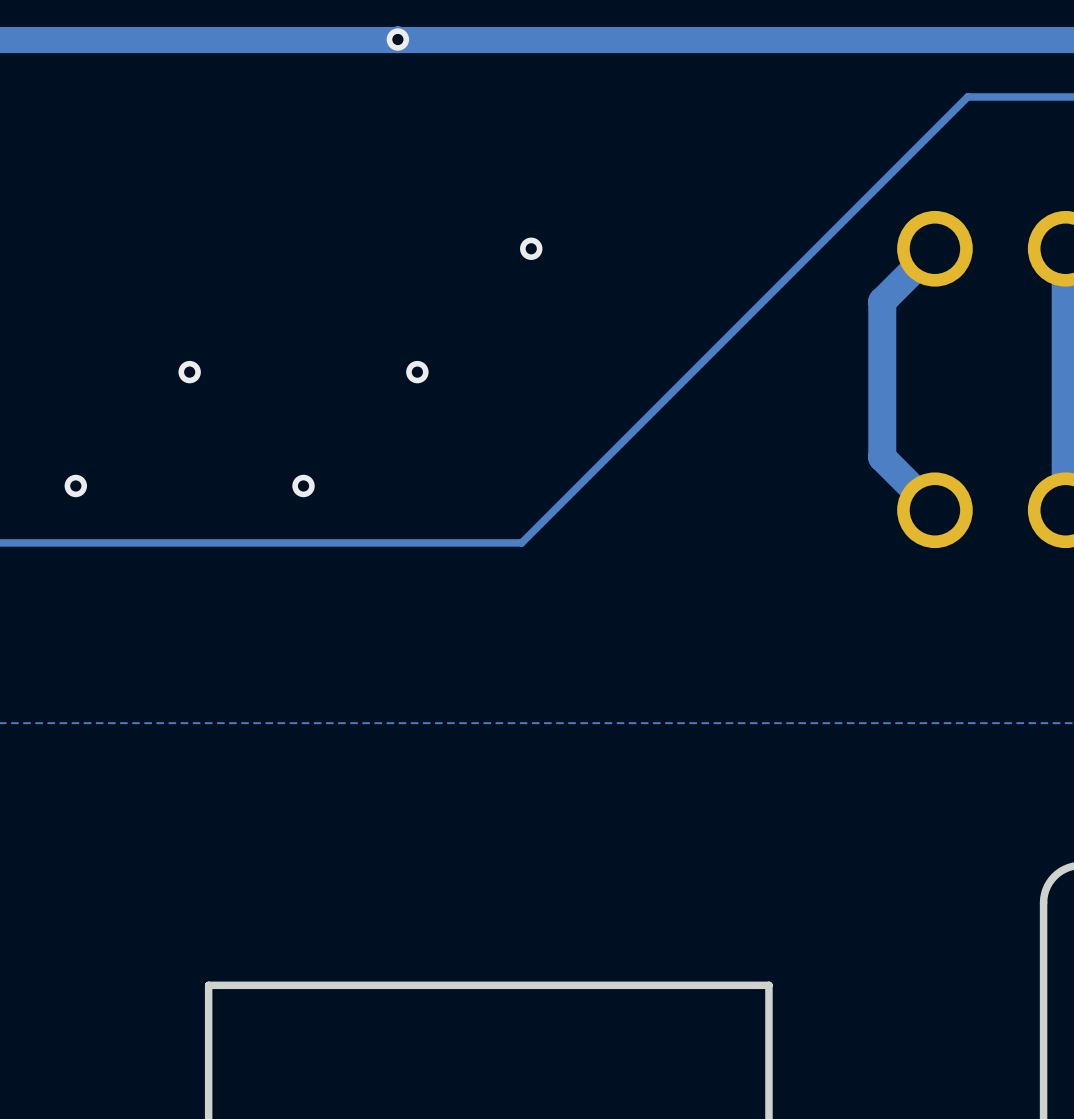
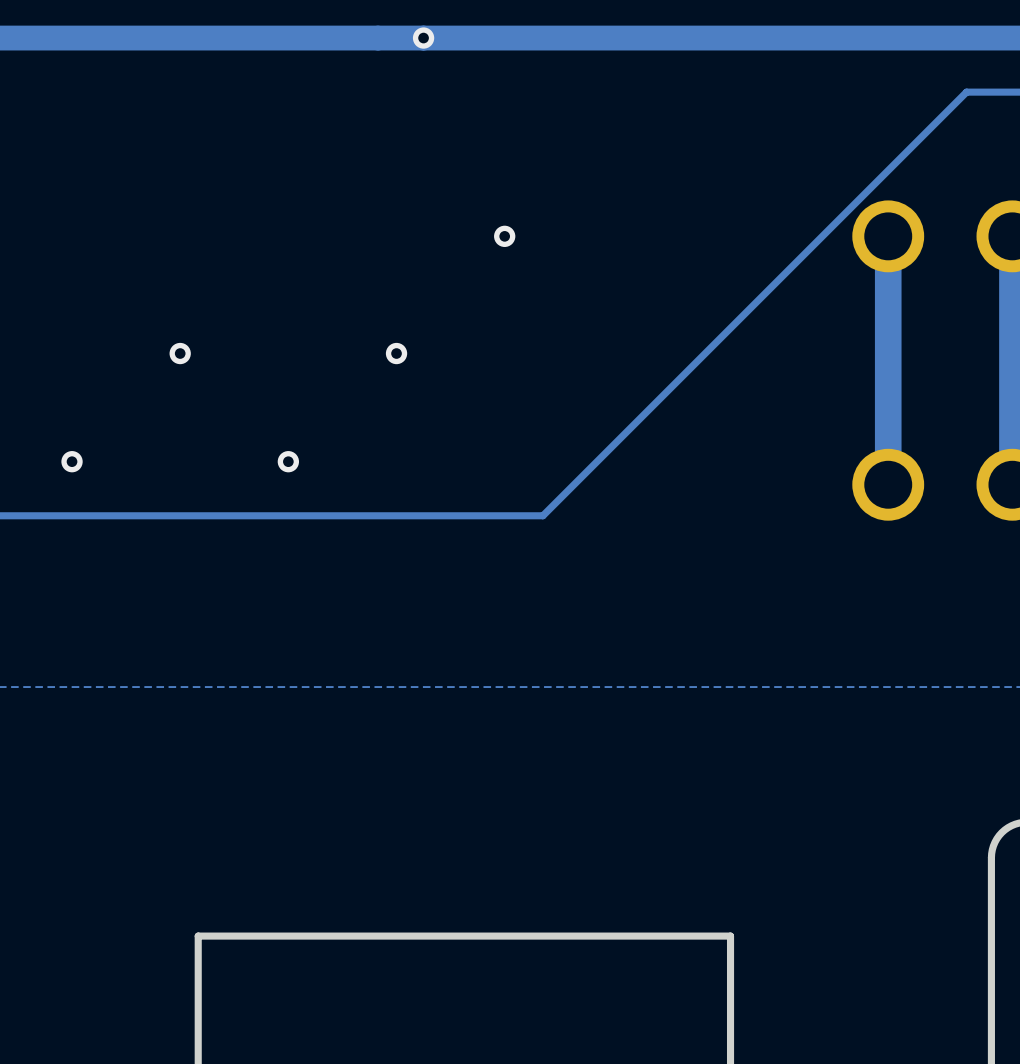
via position: (397, 39) -> (423, 38)
track: (1017, 96) (967, 96) (521, 542) -> (966, 92) (542, 515) (495, 515)
track: (934, 248) (882, 301) (882, 457) (934, 510) -> (888, 236) (888, 484)

